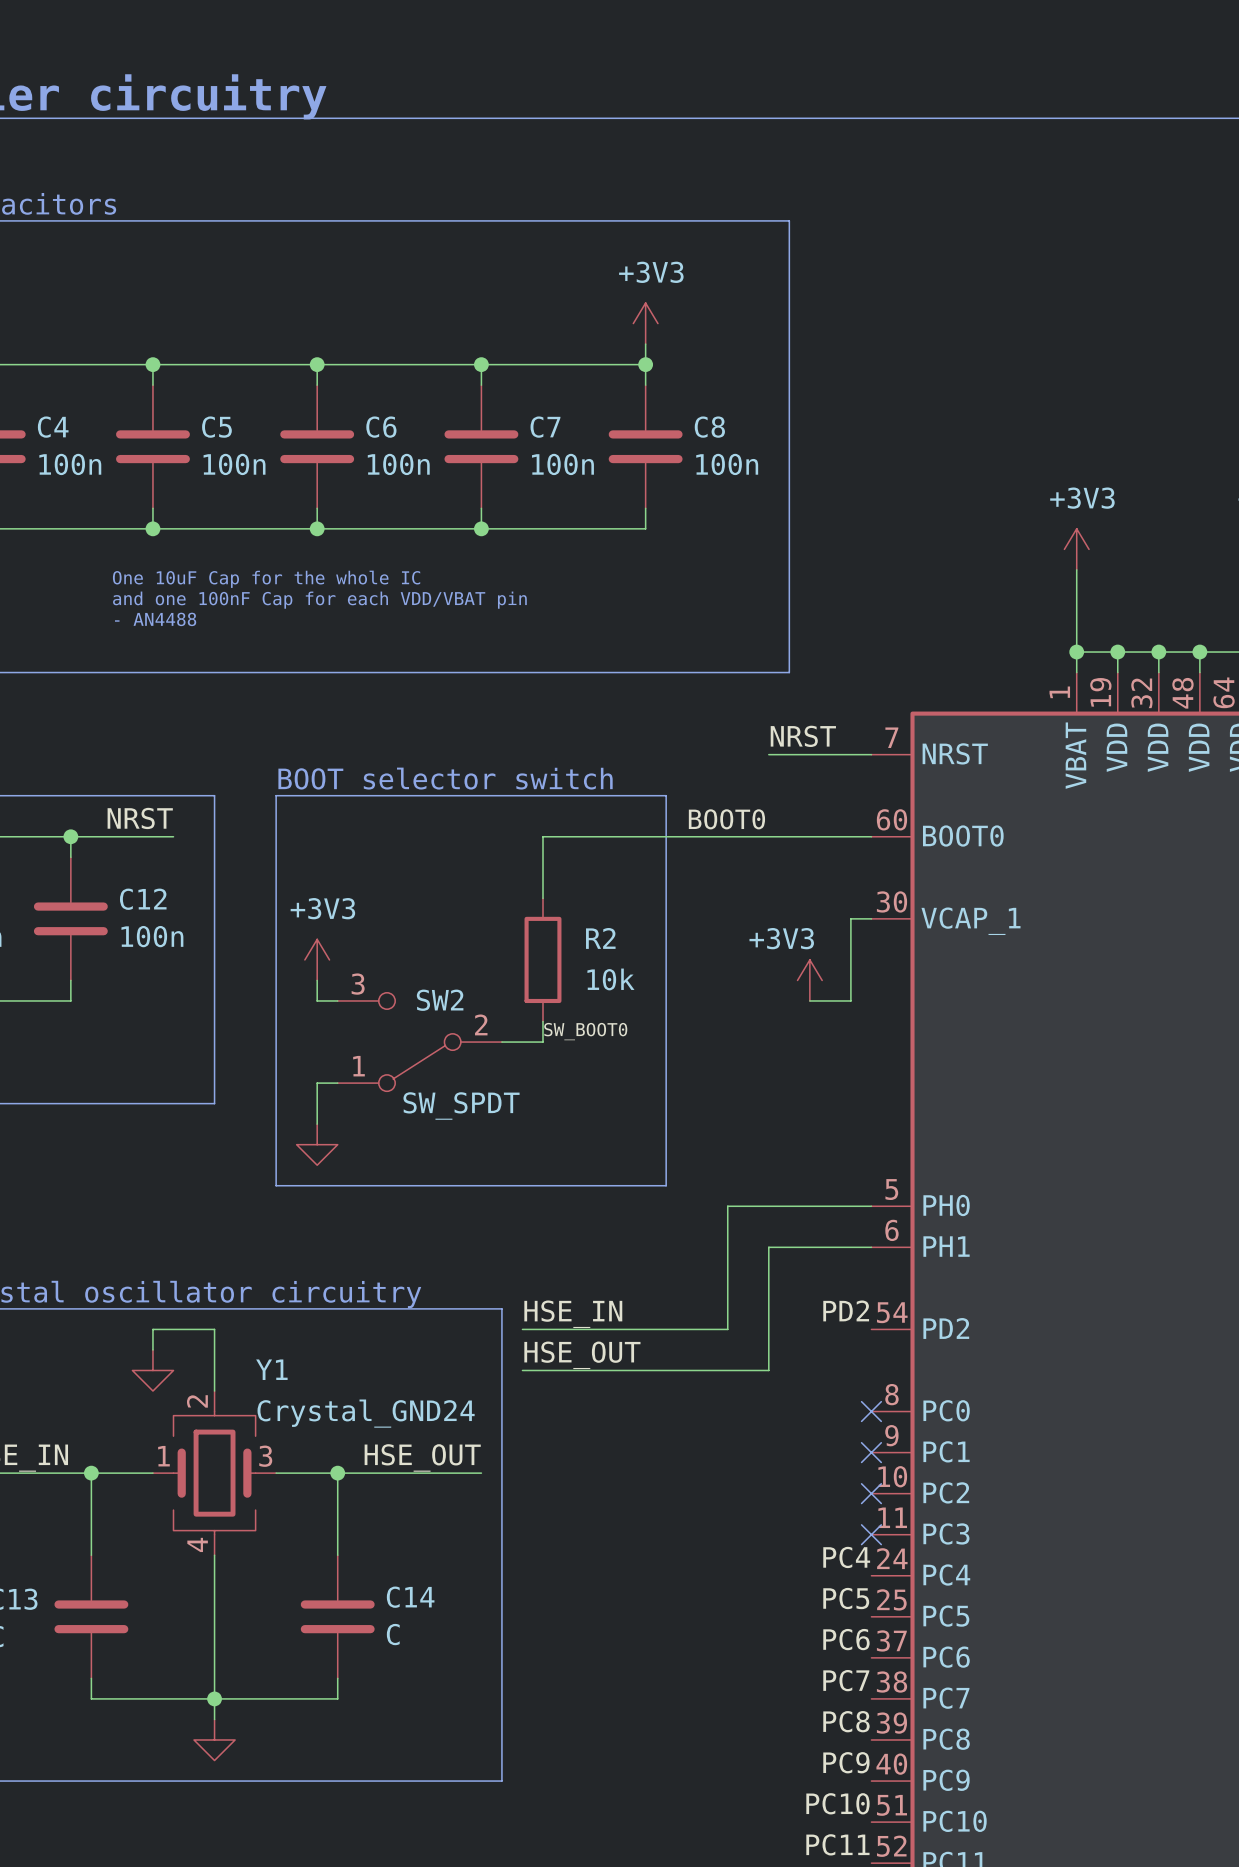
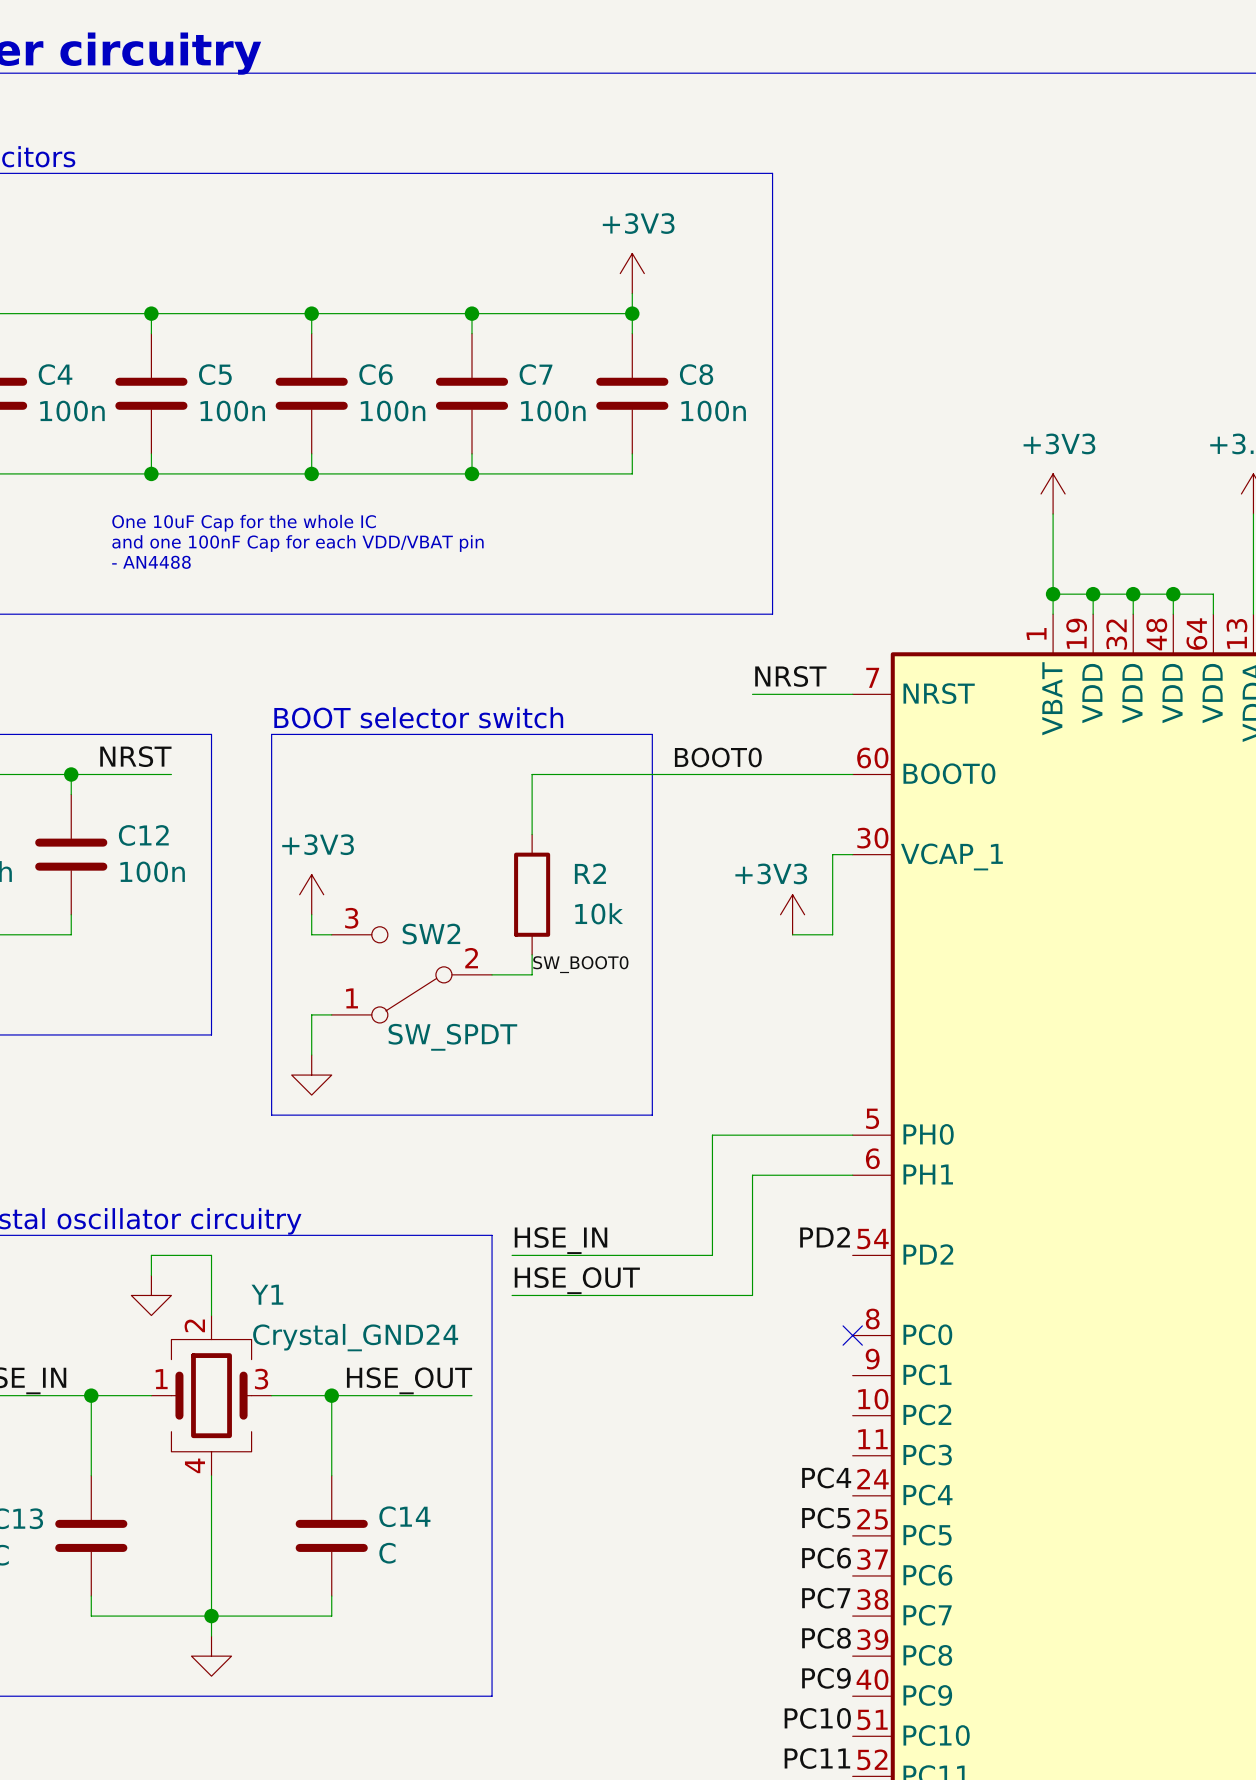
no-connect mark: (871, 1452) -> none
no-connect mark: (871, 1493) -> none
no-connect mark: (871, 1534) -> none

